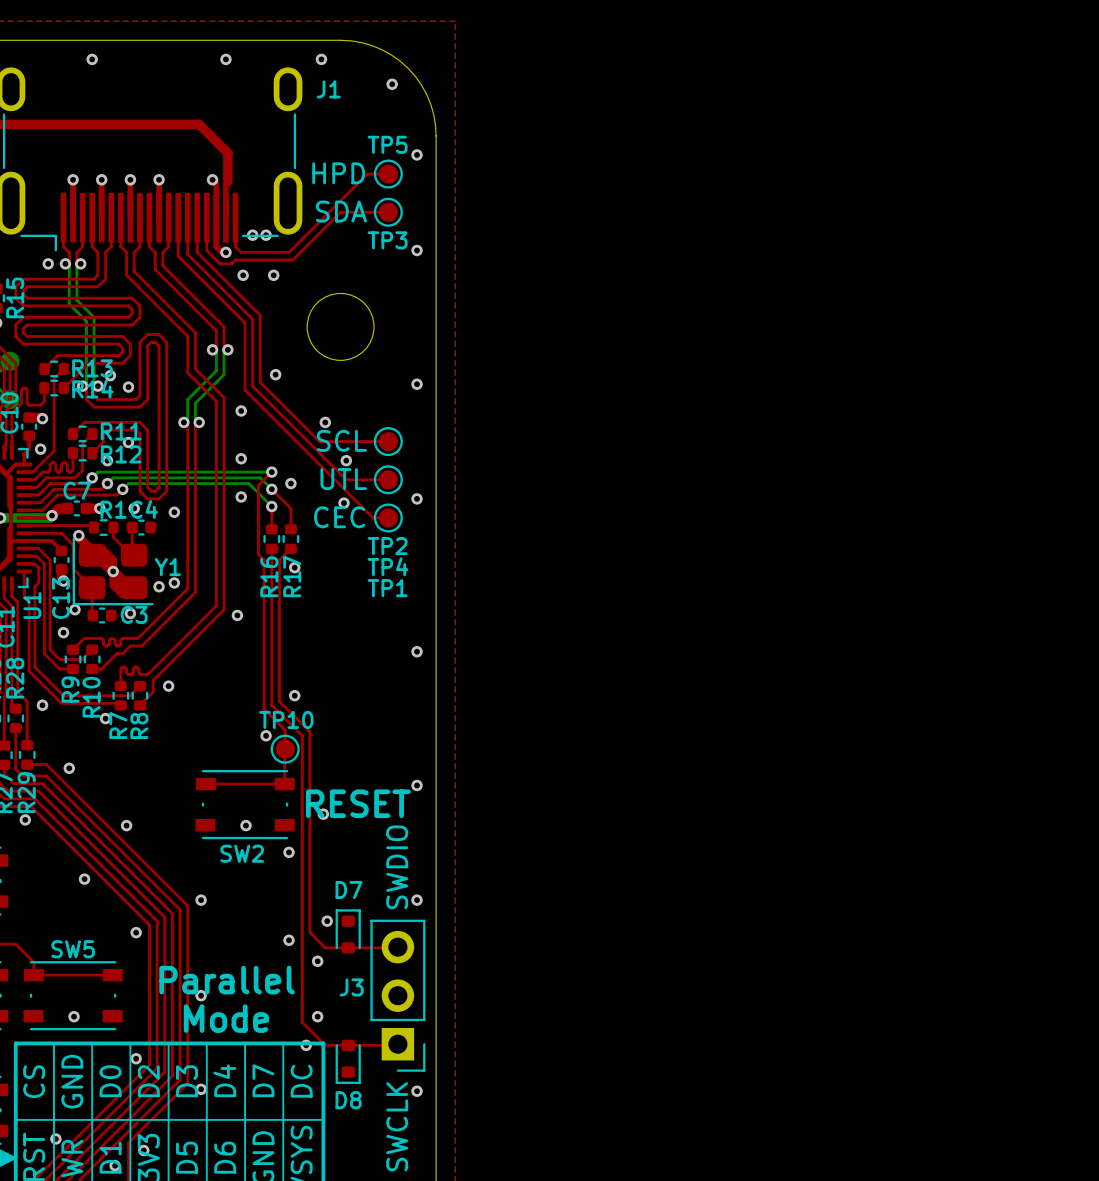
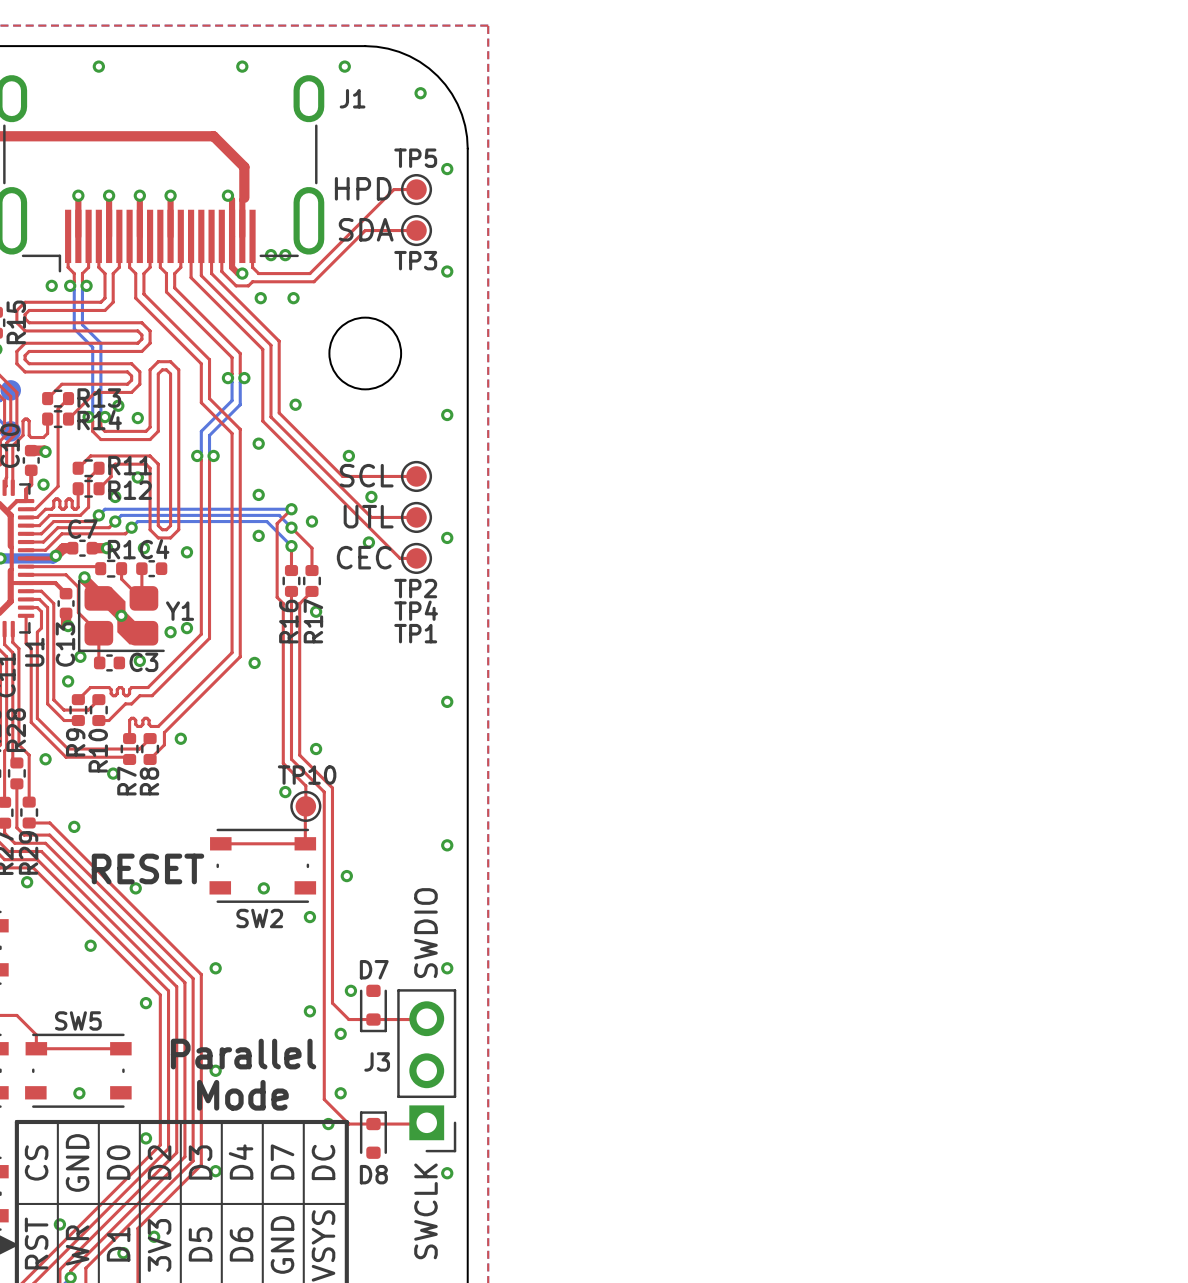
text position: RESET (358, 803) -> RESET (147, 868)
D7 rotation: 0° (348, 931) -> 180° (373, 1008)
D8 rotation: 0° (348, 1061) -> 180° (373, 1135)

